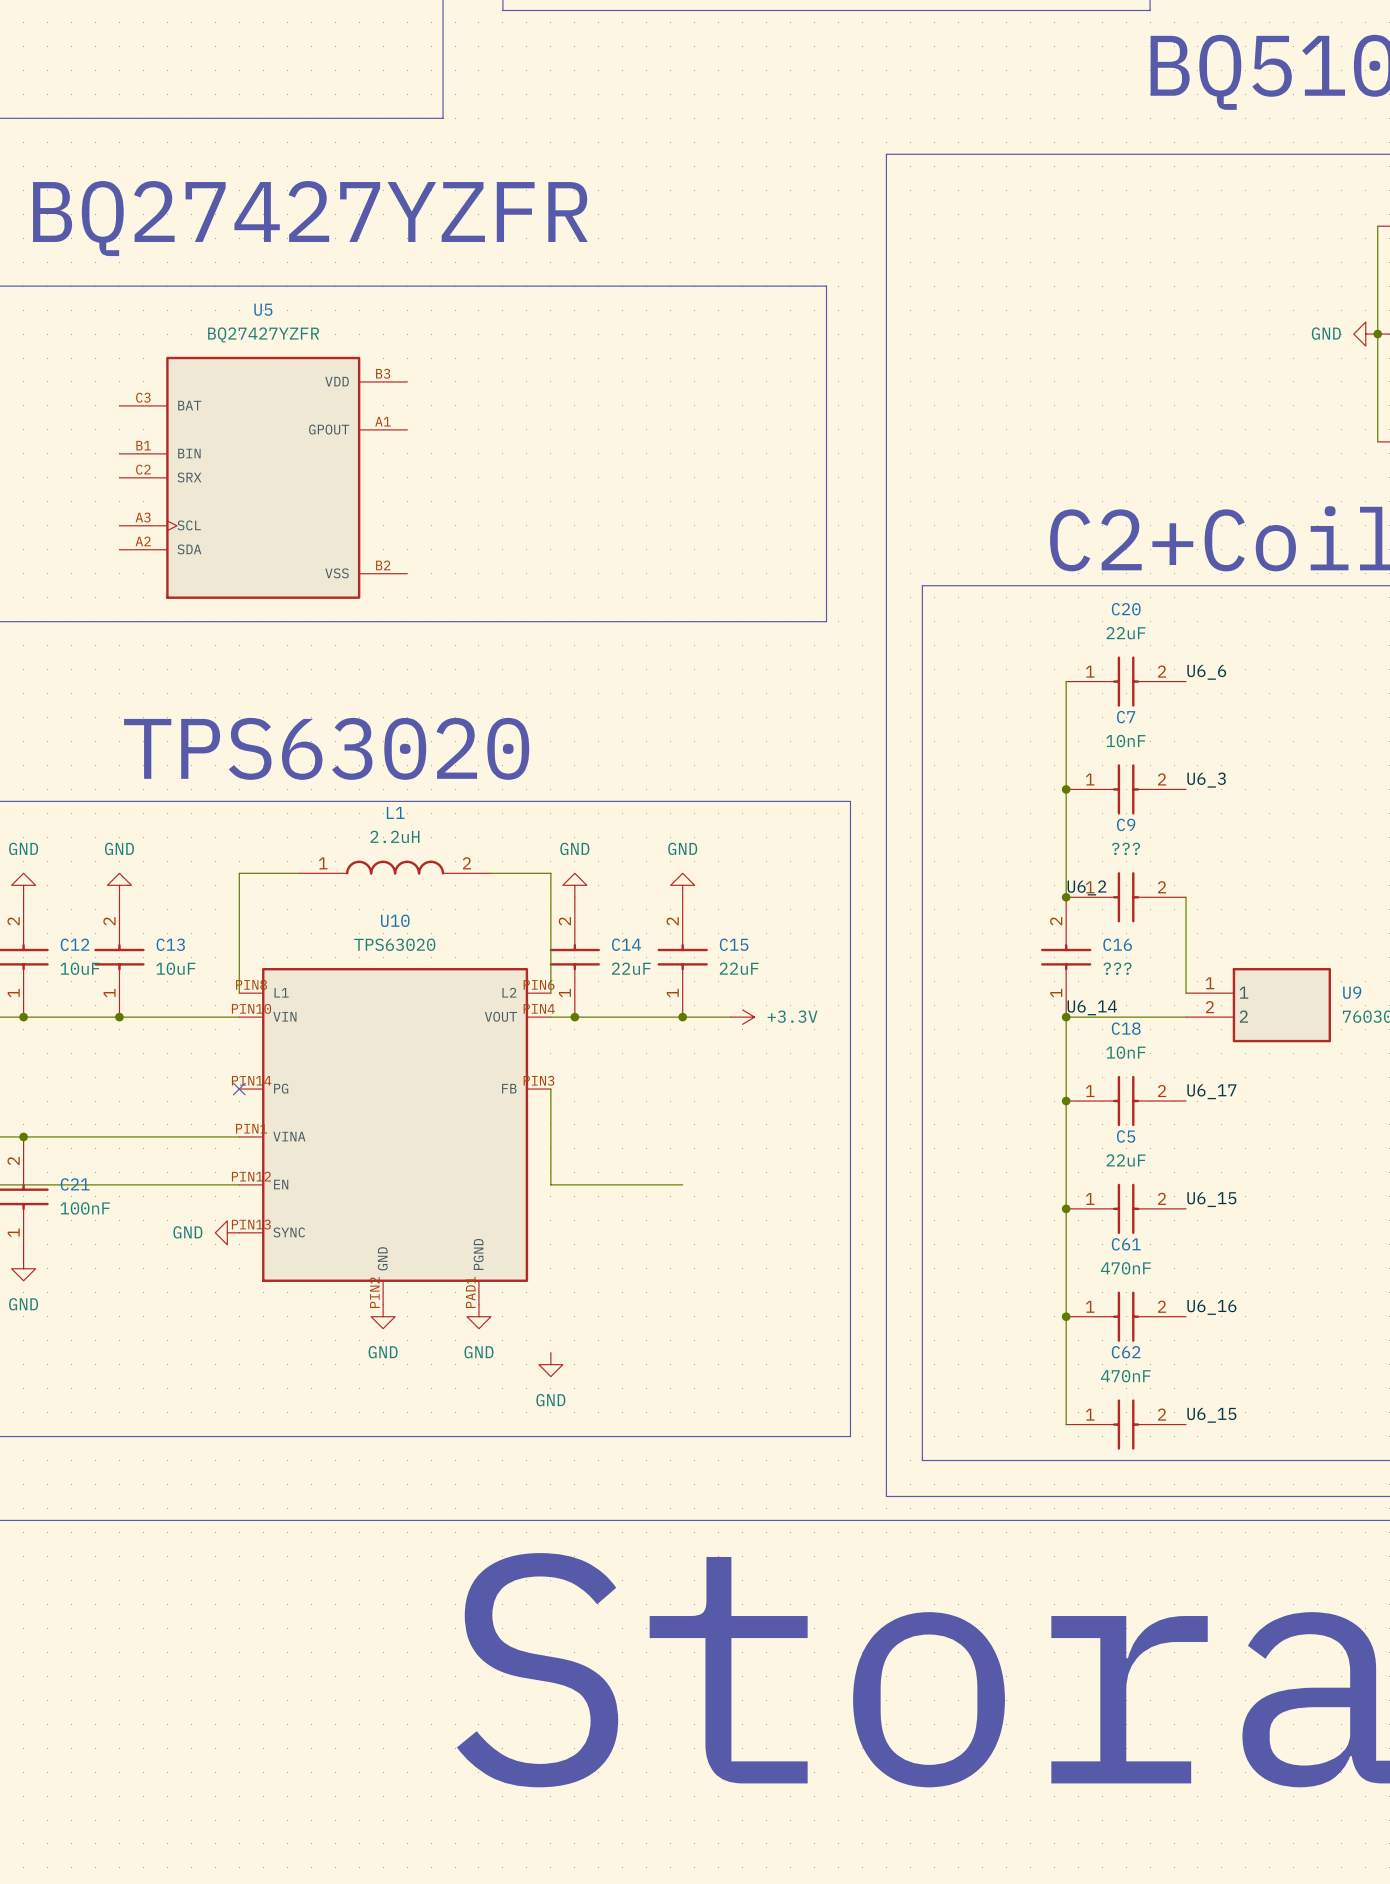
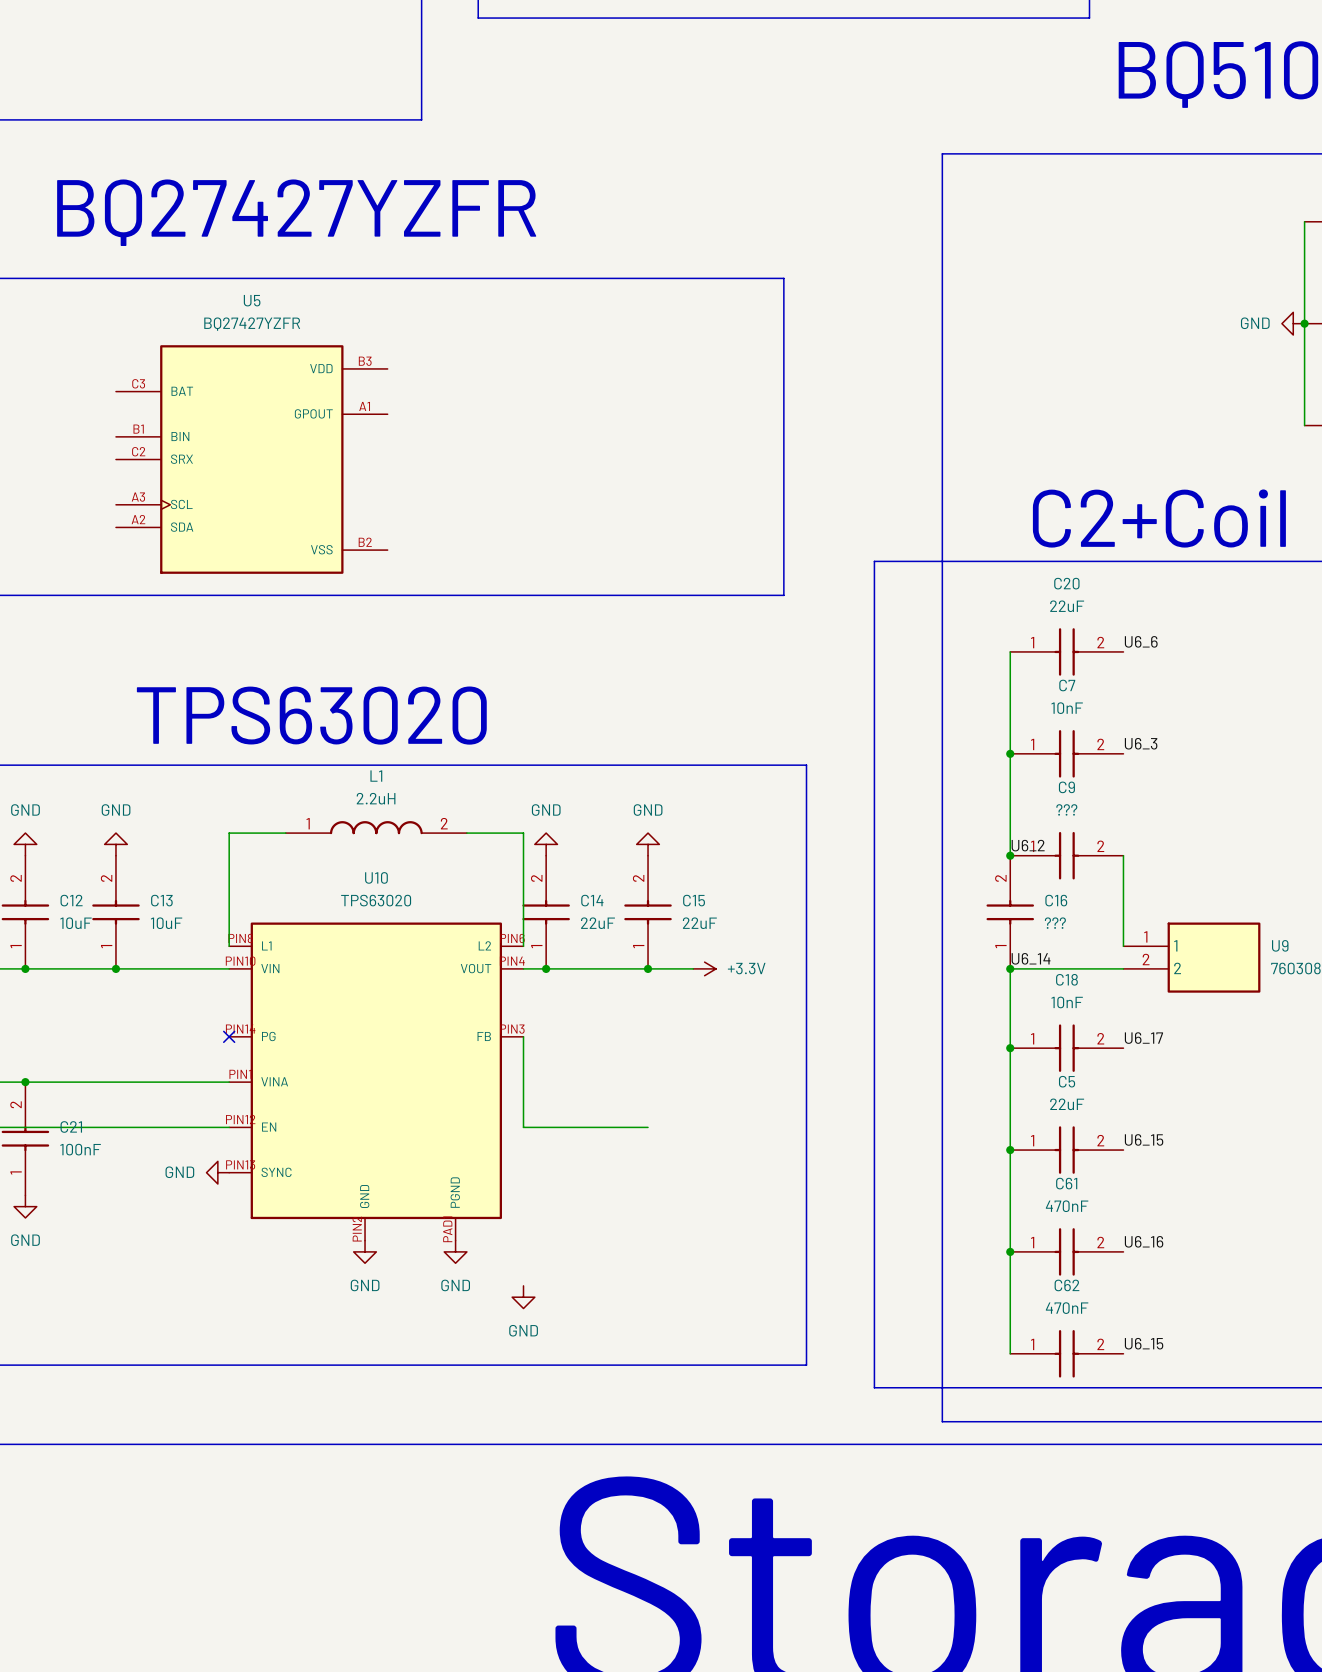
line: (994, 154) (886, 154) (886, 1496) (994, 1496) -> (942, 153) (942, 1421)

